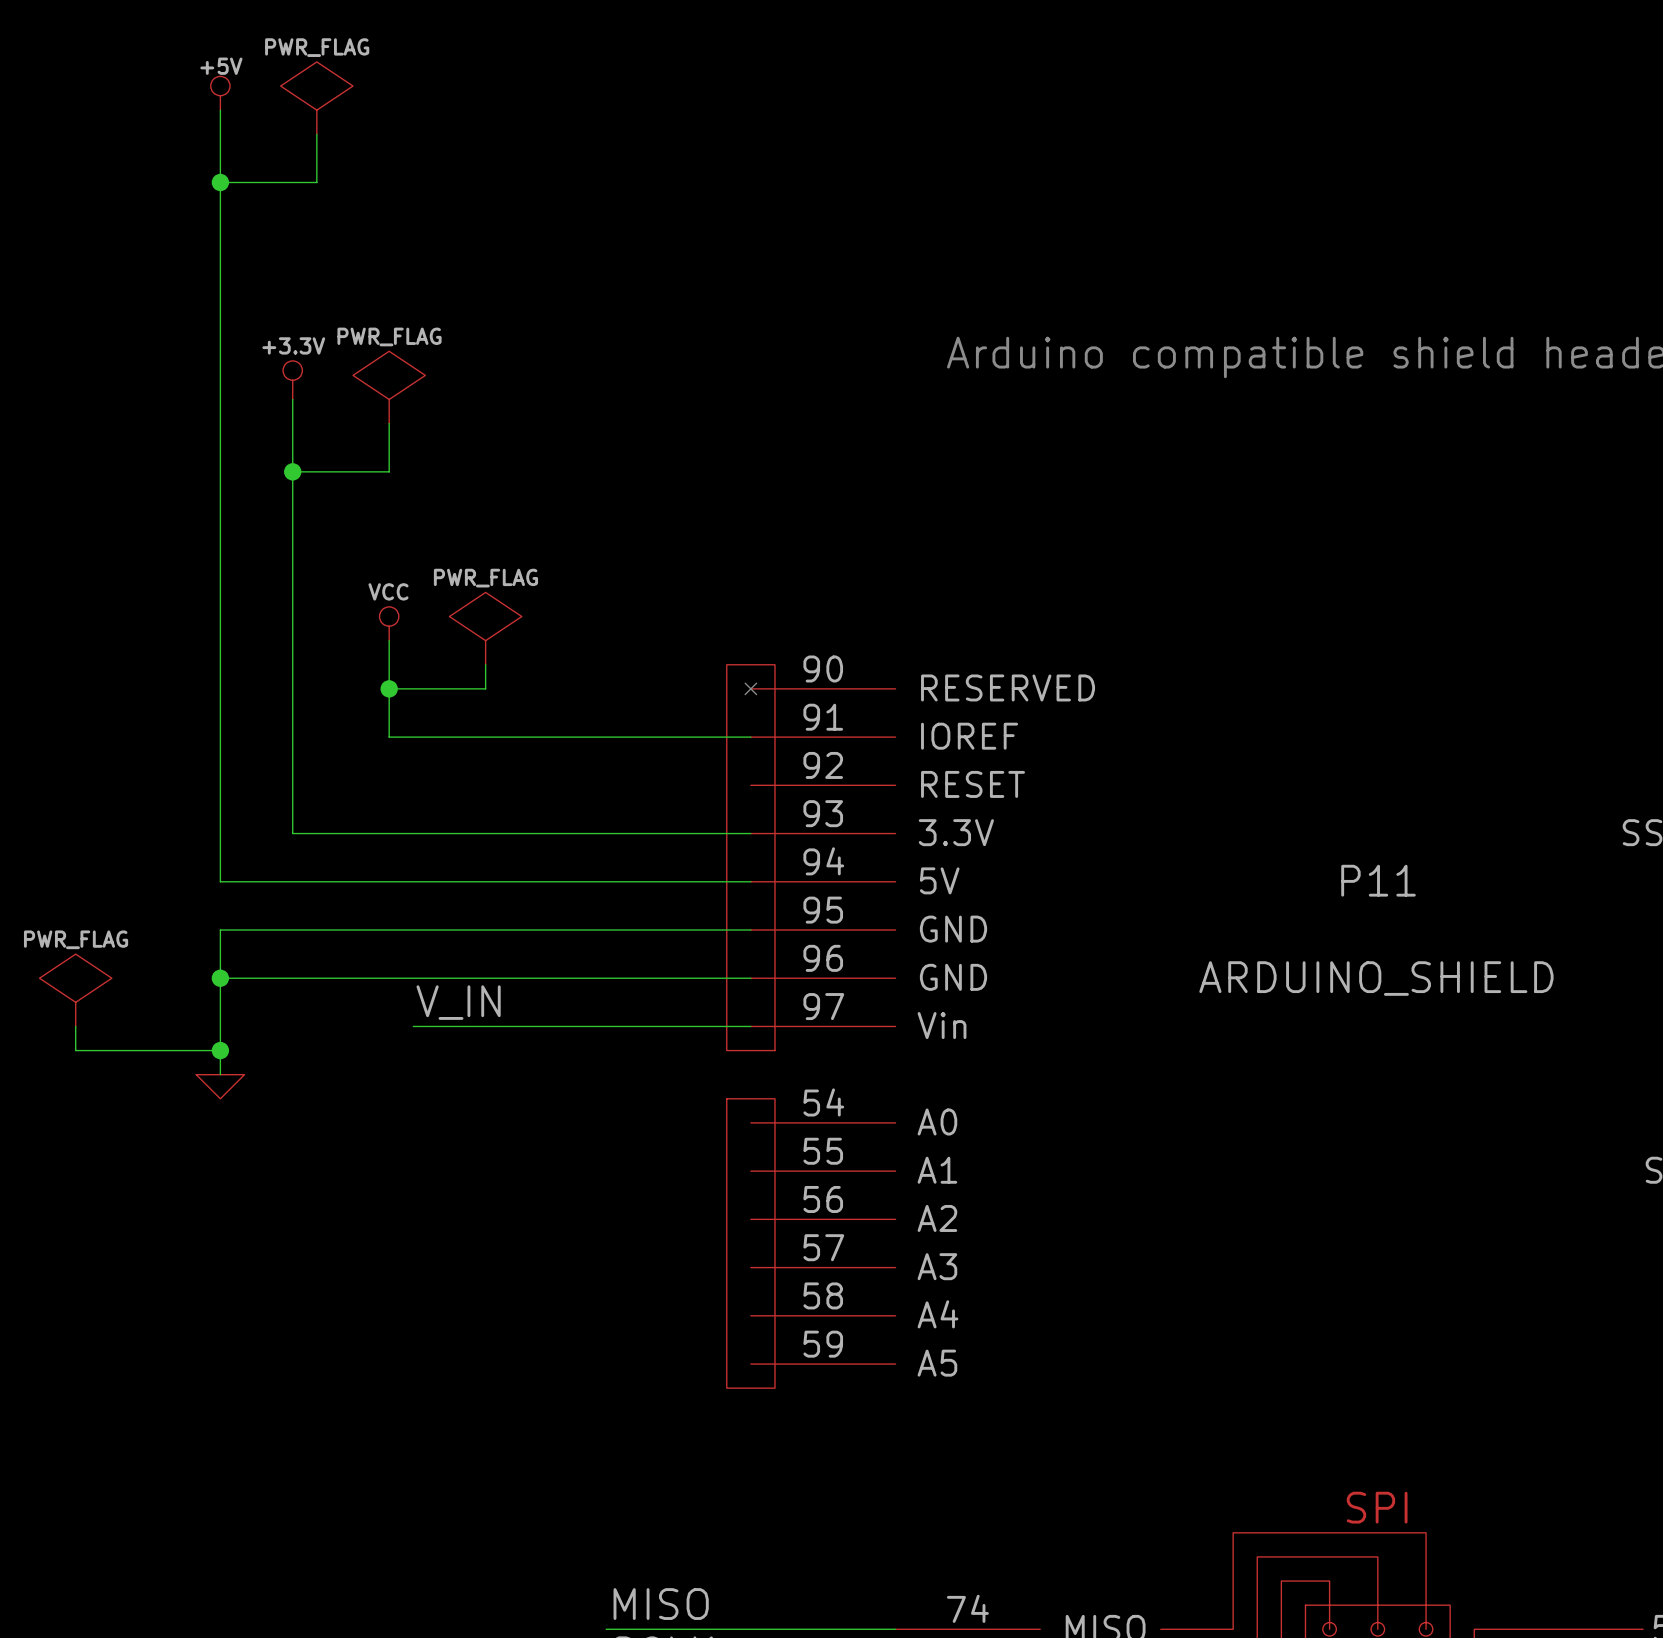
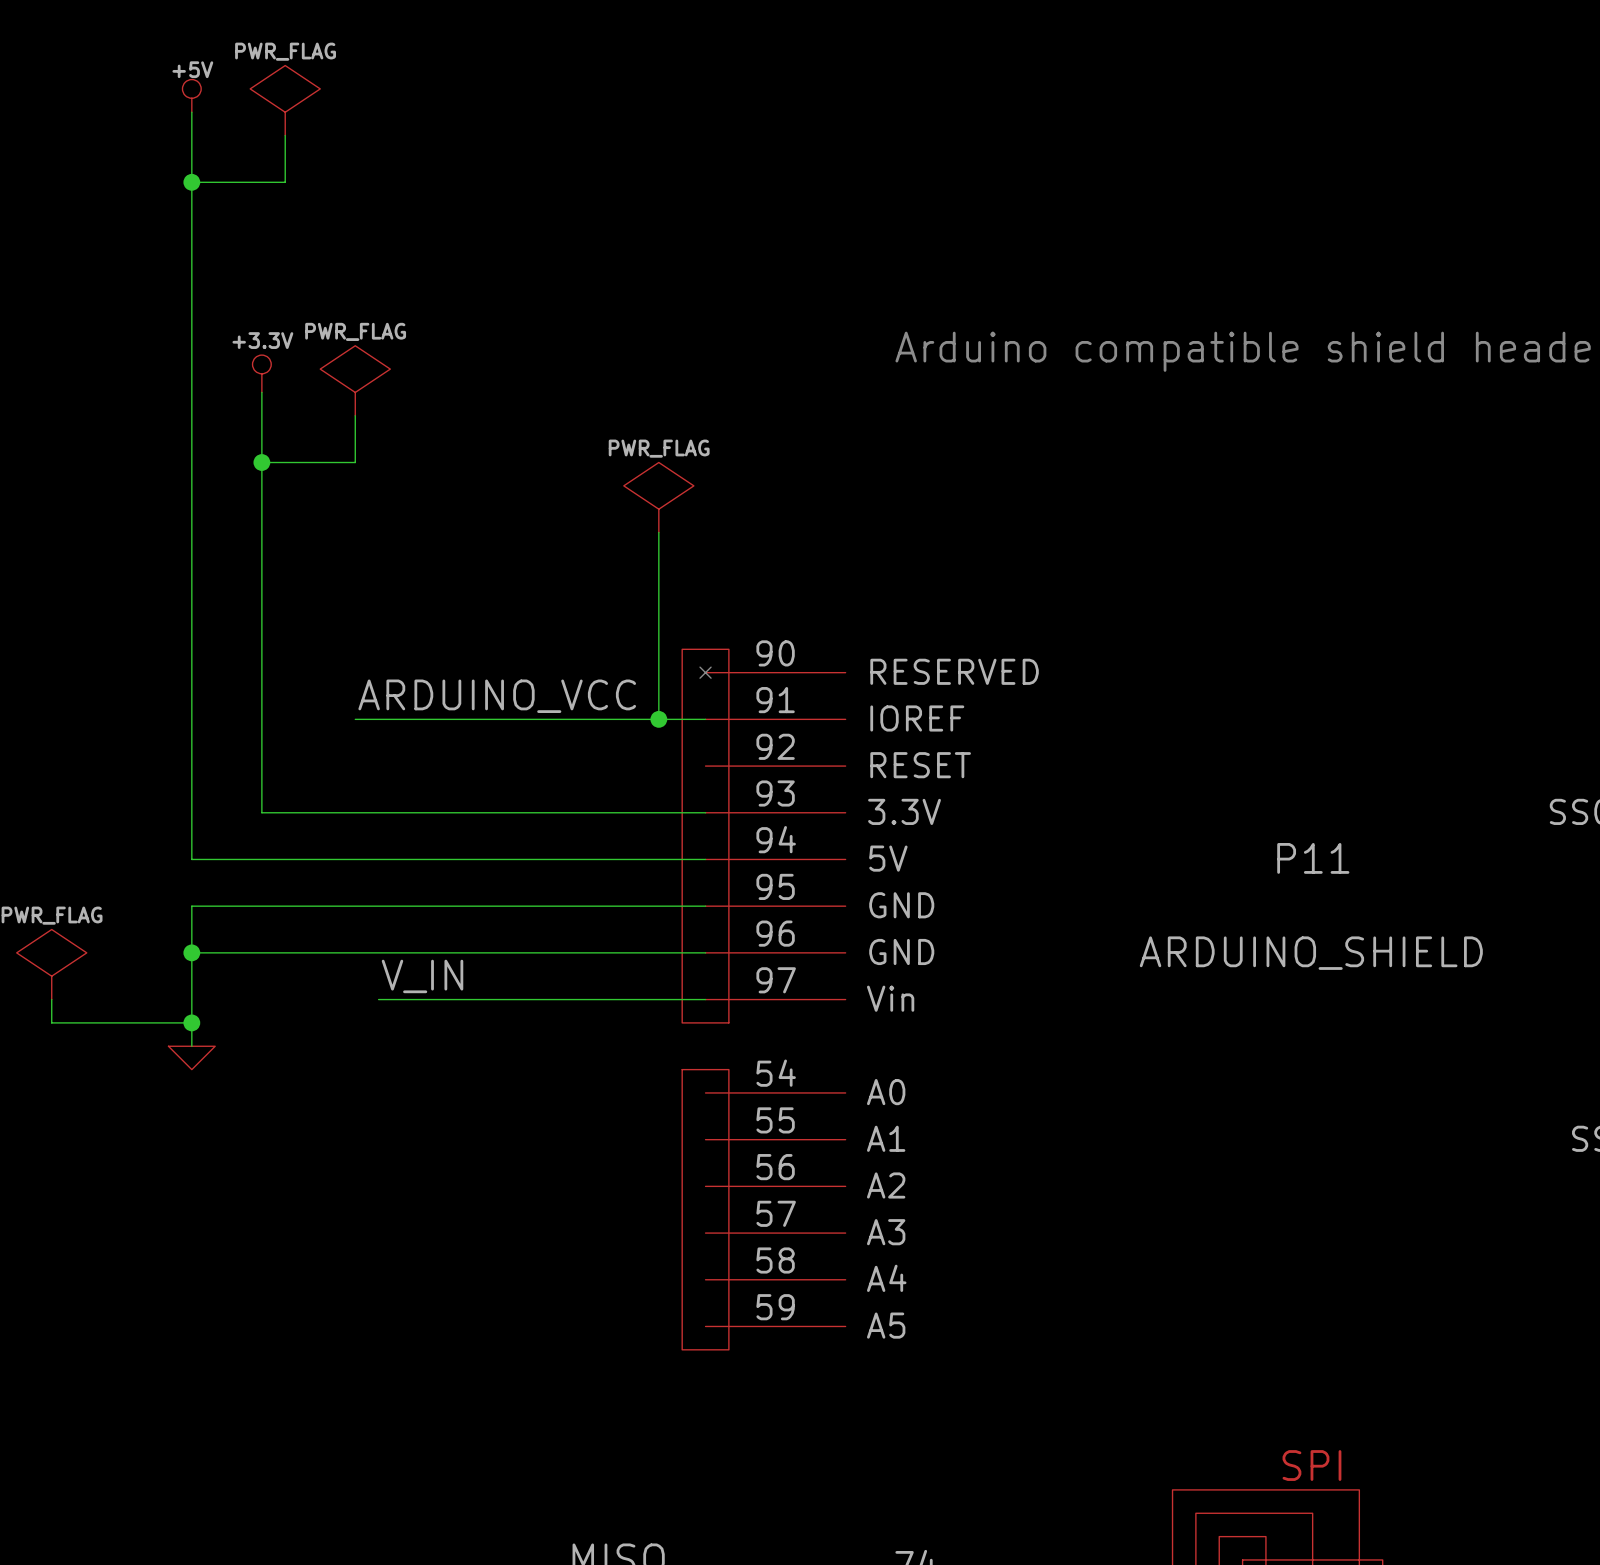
wire: none -> (658, 532) (658, 719)
power symbol: VCC (389, 623) -> none
power symbol position: PWR_FLAG (485, 628) -> PWR_FLAG (658, 497)
wire: (389, 640) (389, 737) -> none
wire: (485, 664) (485, 688) (389, 688) -> none
junction: (389, 688) -> none
label: none -> ARDUINO_VCC (497, 696)
junction: none -> (658, 719)

